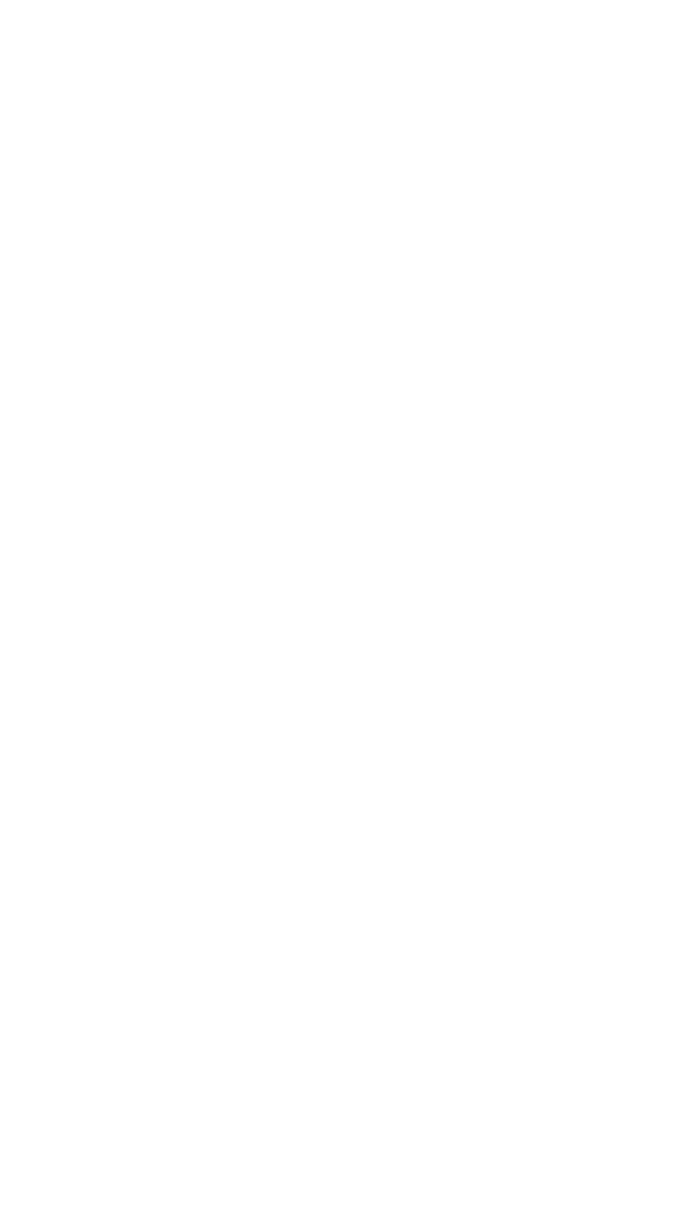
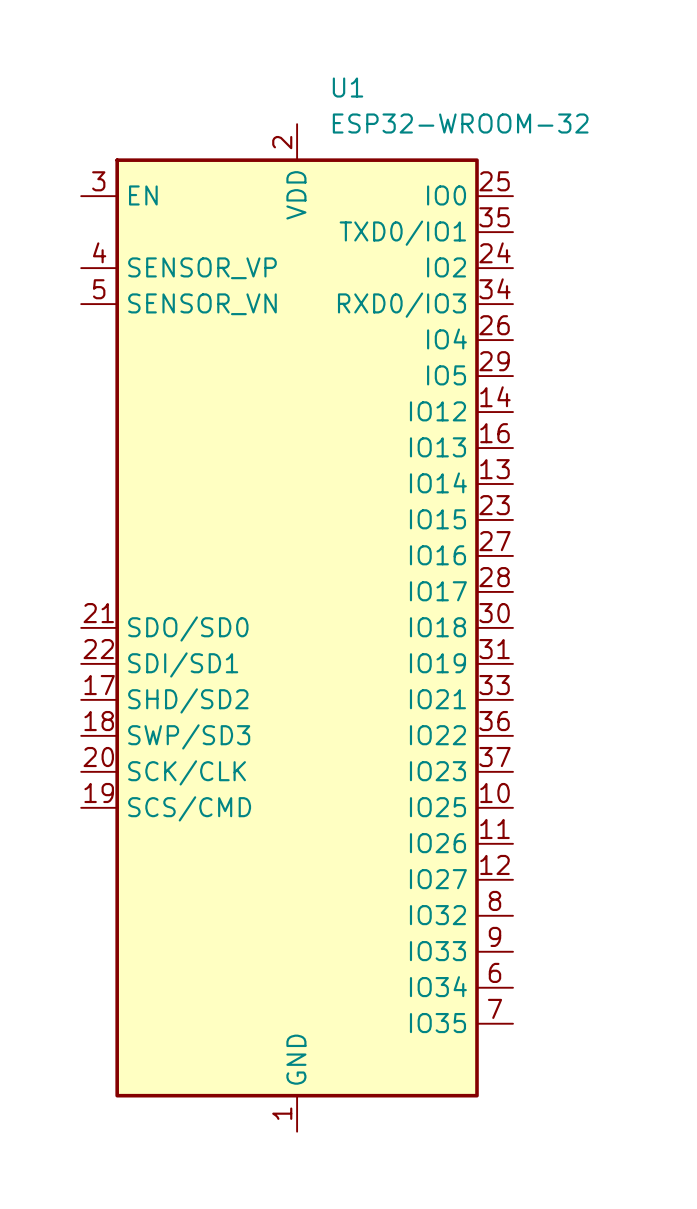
U1: none -> ESP32-WROOM-32 (297, 627)

